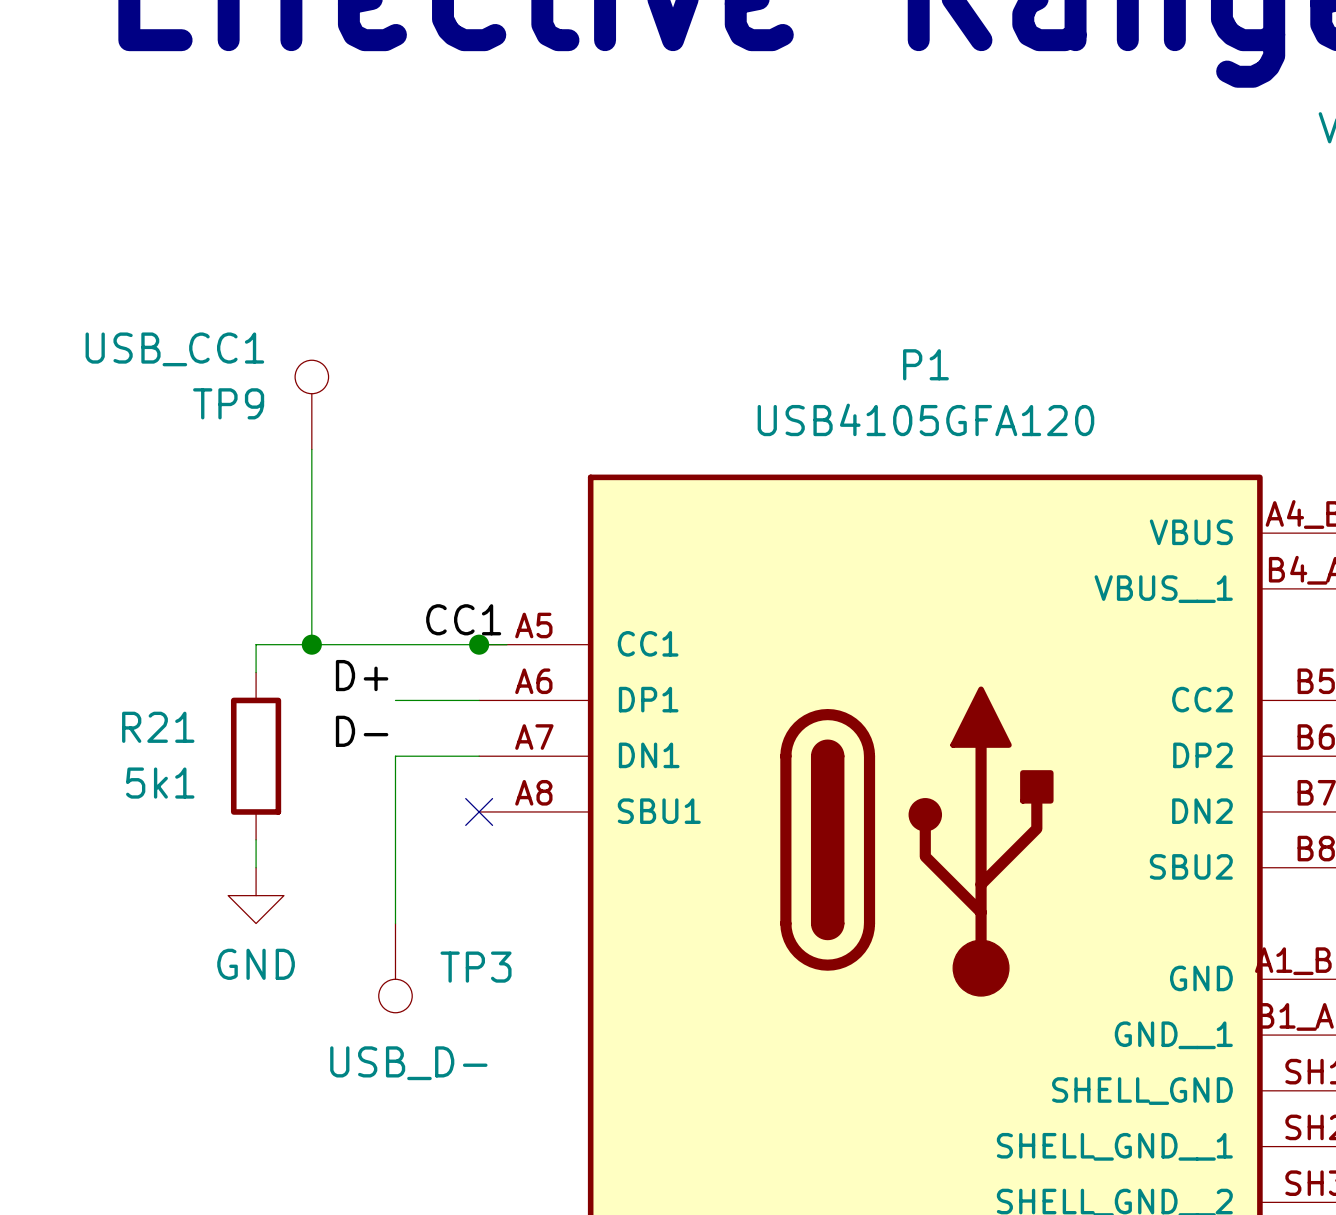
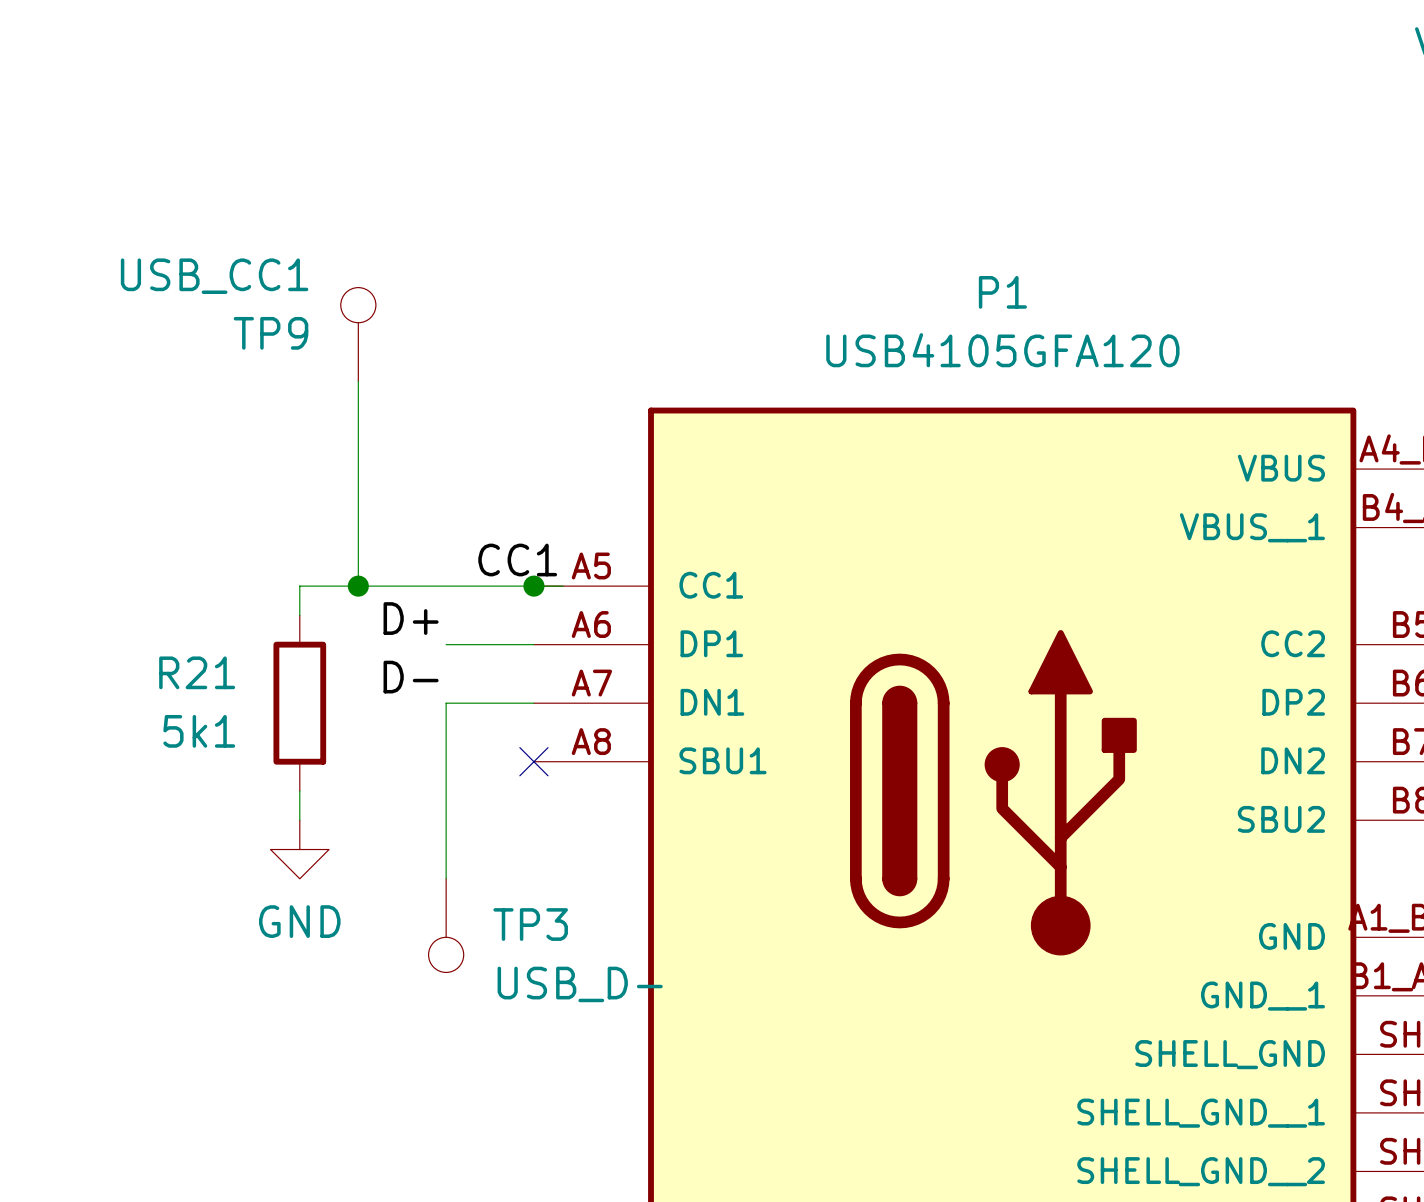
TP3 value position: USB_D- (408, 1063) -> USB_D- (580, 984)

